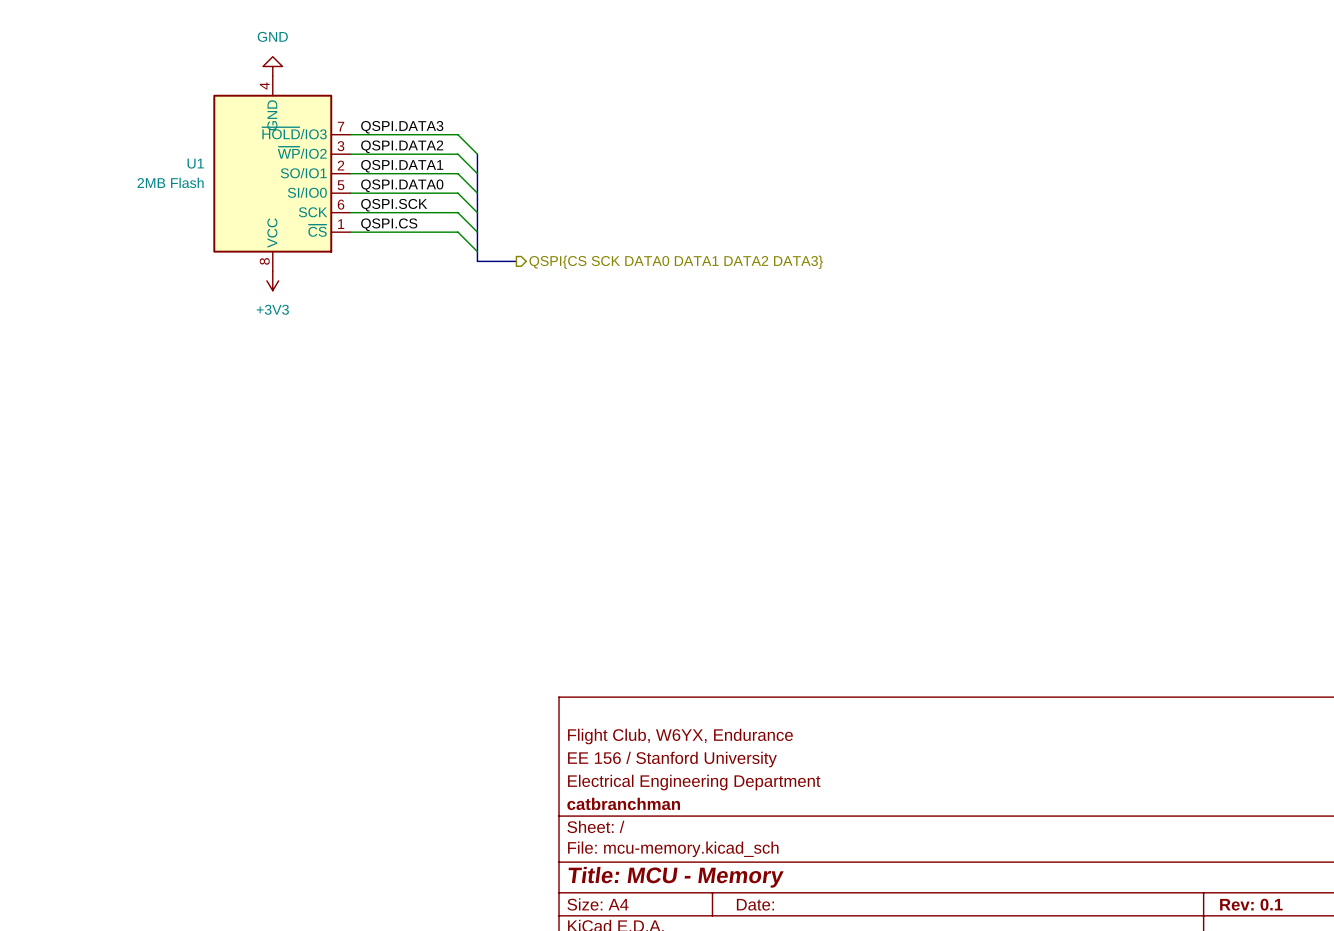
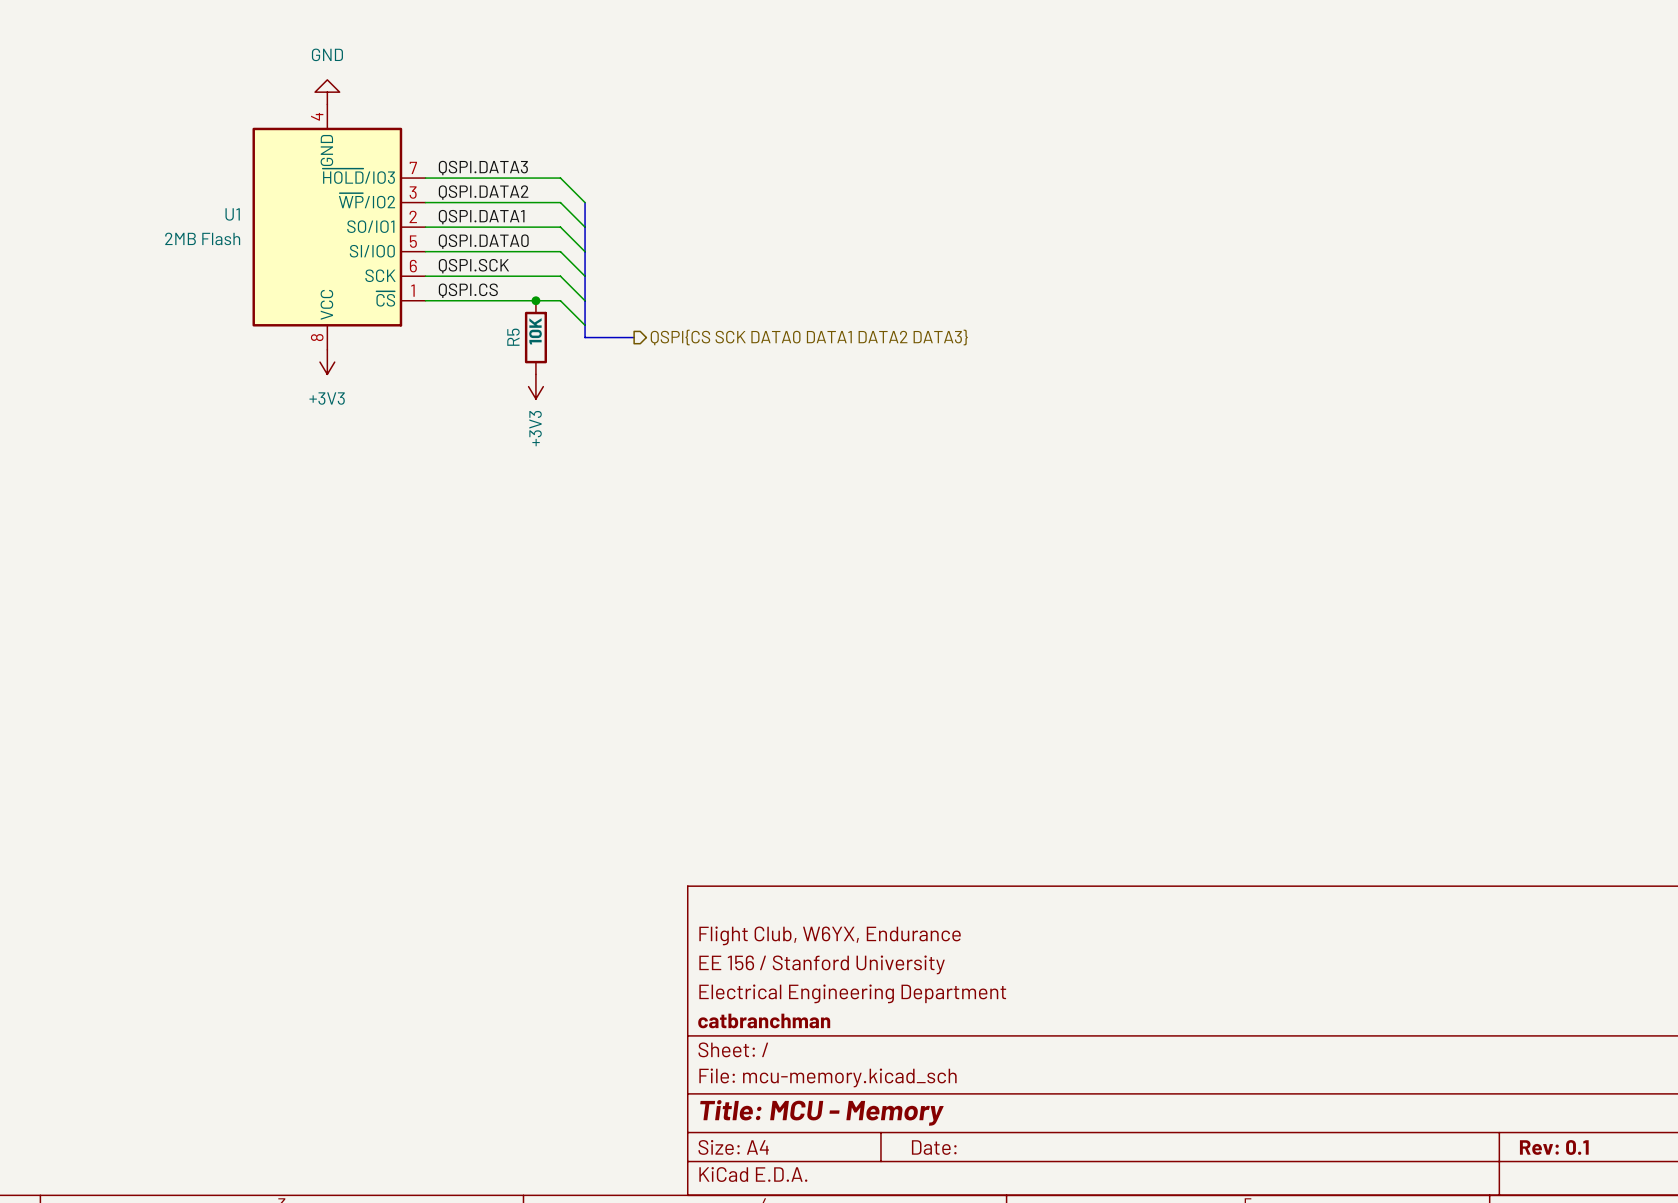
junction: none -> (535, 300)
R5: none -> 10K (535, 337)
power symbol: none -> +3V3 (535, 386)

